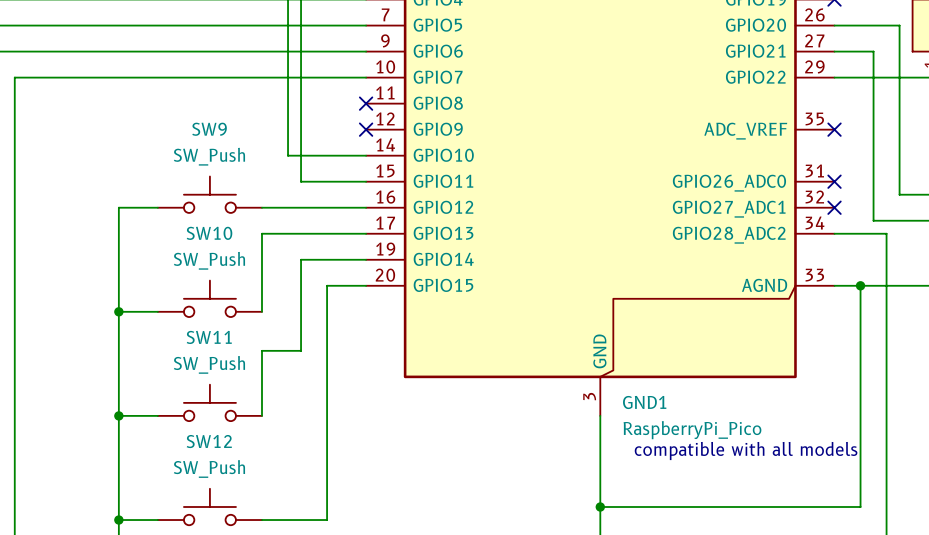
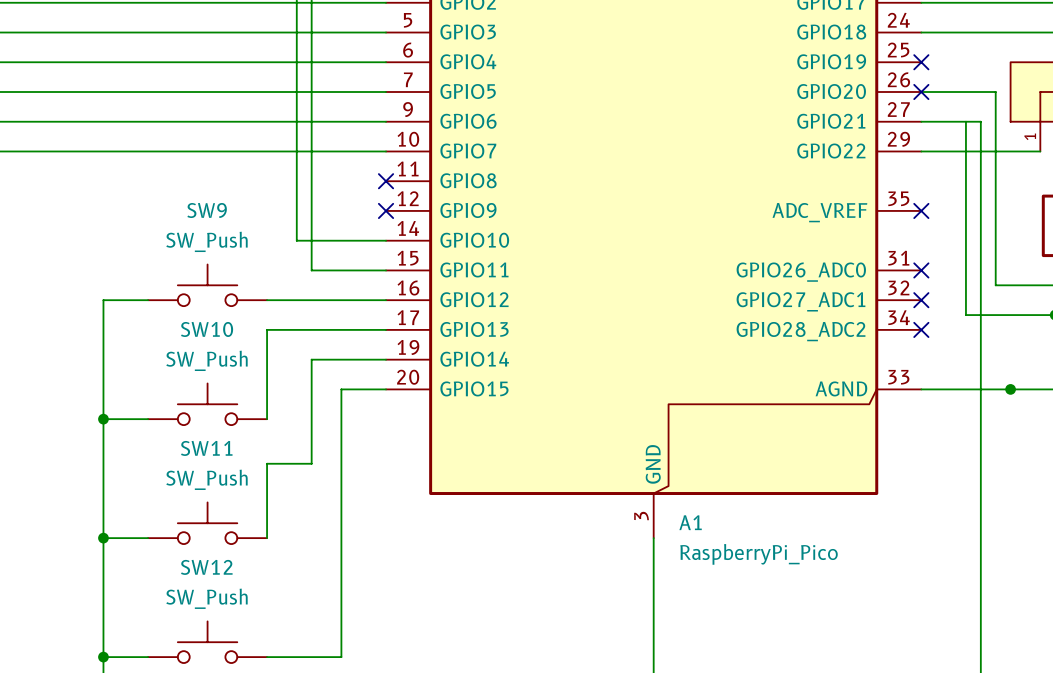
no-connect mark: none -> (921, 91)
wire: (834, 233) (886, 233) -> (965, 121) (980, 121) (980, 329)
no-connect mark: none -> (921, 329)
wire: (860, 285) (860, 506) (600, 506) -> none
junction position: (860, 285) -> (1010, 389)
GND1 name: GND1 (644, 402) -> A1 (690, 522)
text: compatible with all models (746, 451) -> none
junction: (600, 506) -> none

